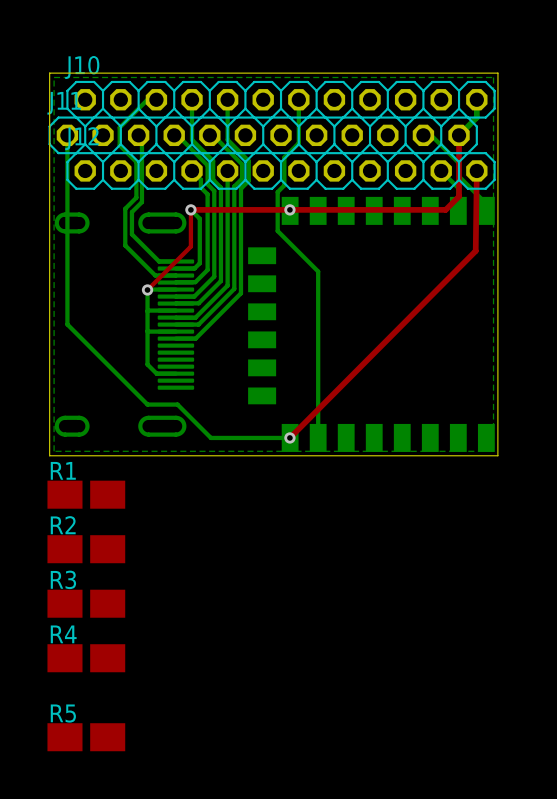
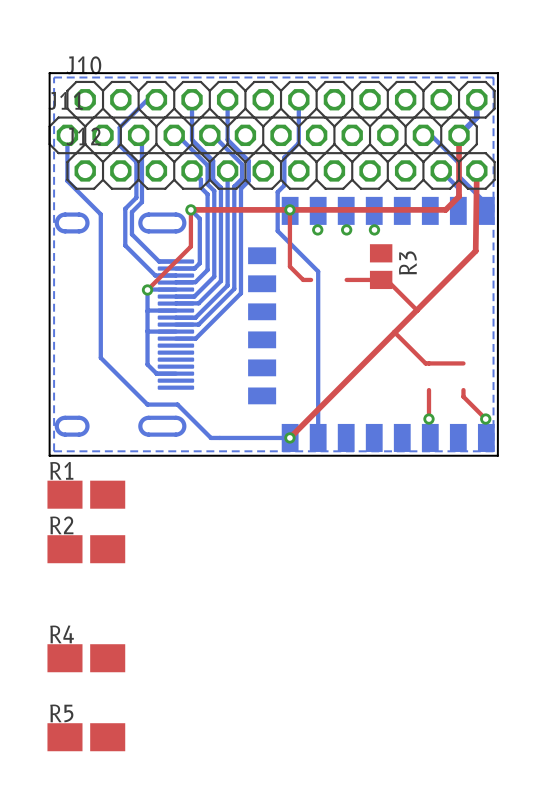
bottom track: (67, 180) (67, 324) (100, 357) -> (67, 180) (100, 214) (100, 357)
top track: none -> (289, 209) (289, 266) (303, 279) (311, 279)
via: none -> (317, 229)
via: none -> (346, 229)
via: none -> (374, 229)
top track: none -> (346, 279) (386, 279) (416, 310)
top track: none -> (394, 332) (425, 363) (463, 363)
top track: none -> (428, 390) (428, 419)
top track: none -> (463, 390) (463, 396) (485, 419)
via: none -> (428, 419)
via: none -> (485, 419)
R3 name position: R3 (63, 579) -> R3 (407, 262)
R3 footprint: [47, 589, 126, 618] -> [369, 244, 393, 290]

